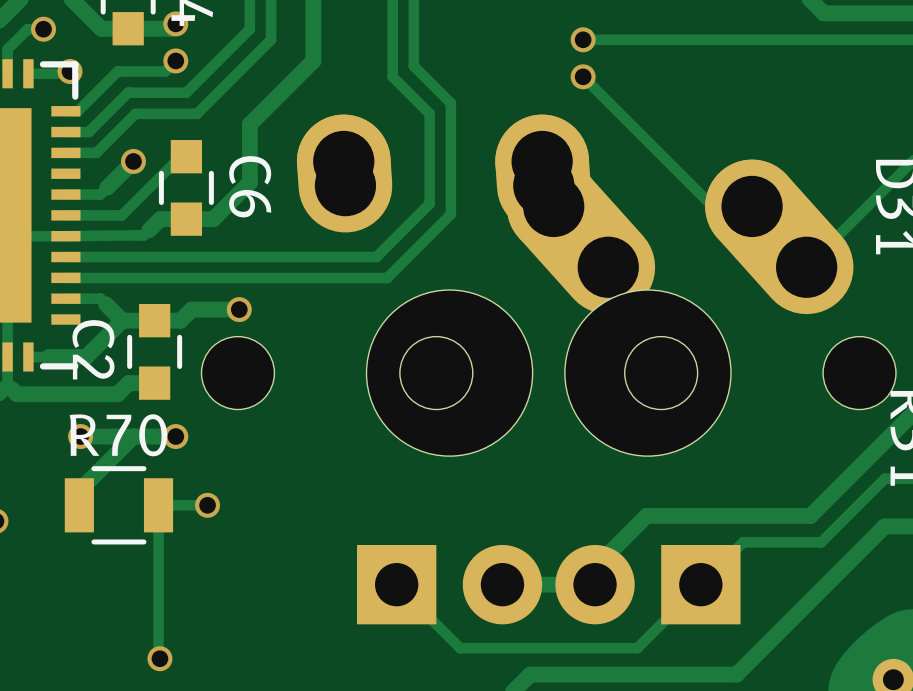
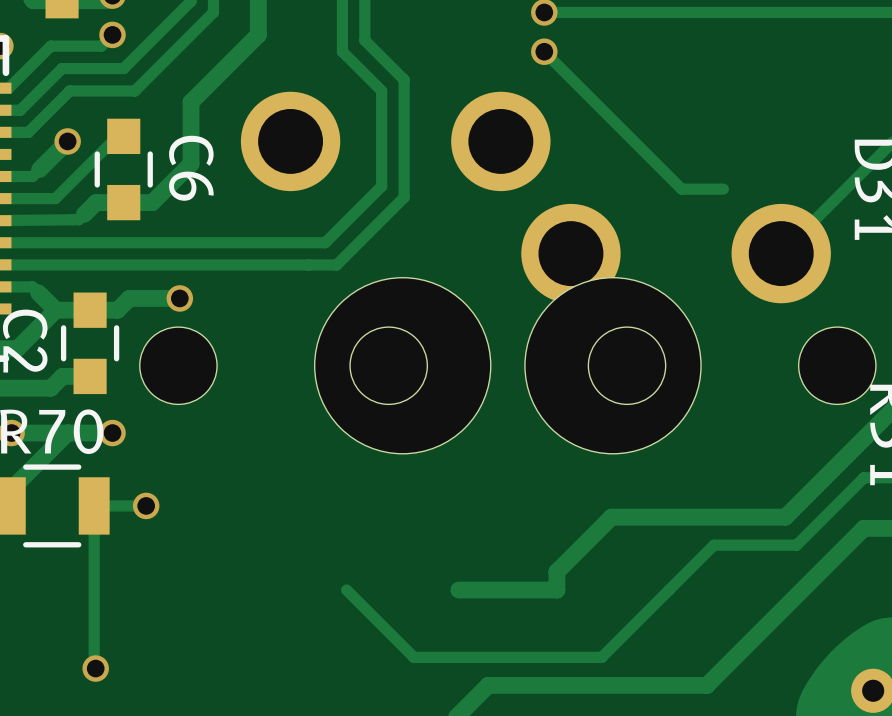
part: none -> (402, 272)
part: none -> (613, 272)
part: (449, 369) -> none
part: (647, 369) -> none

